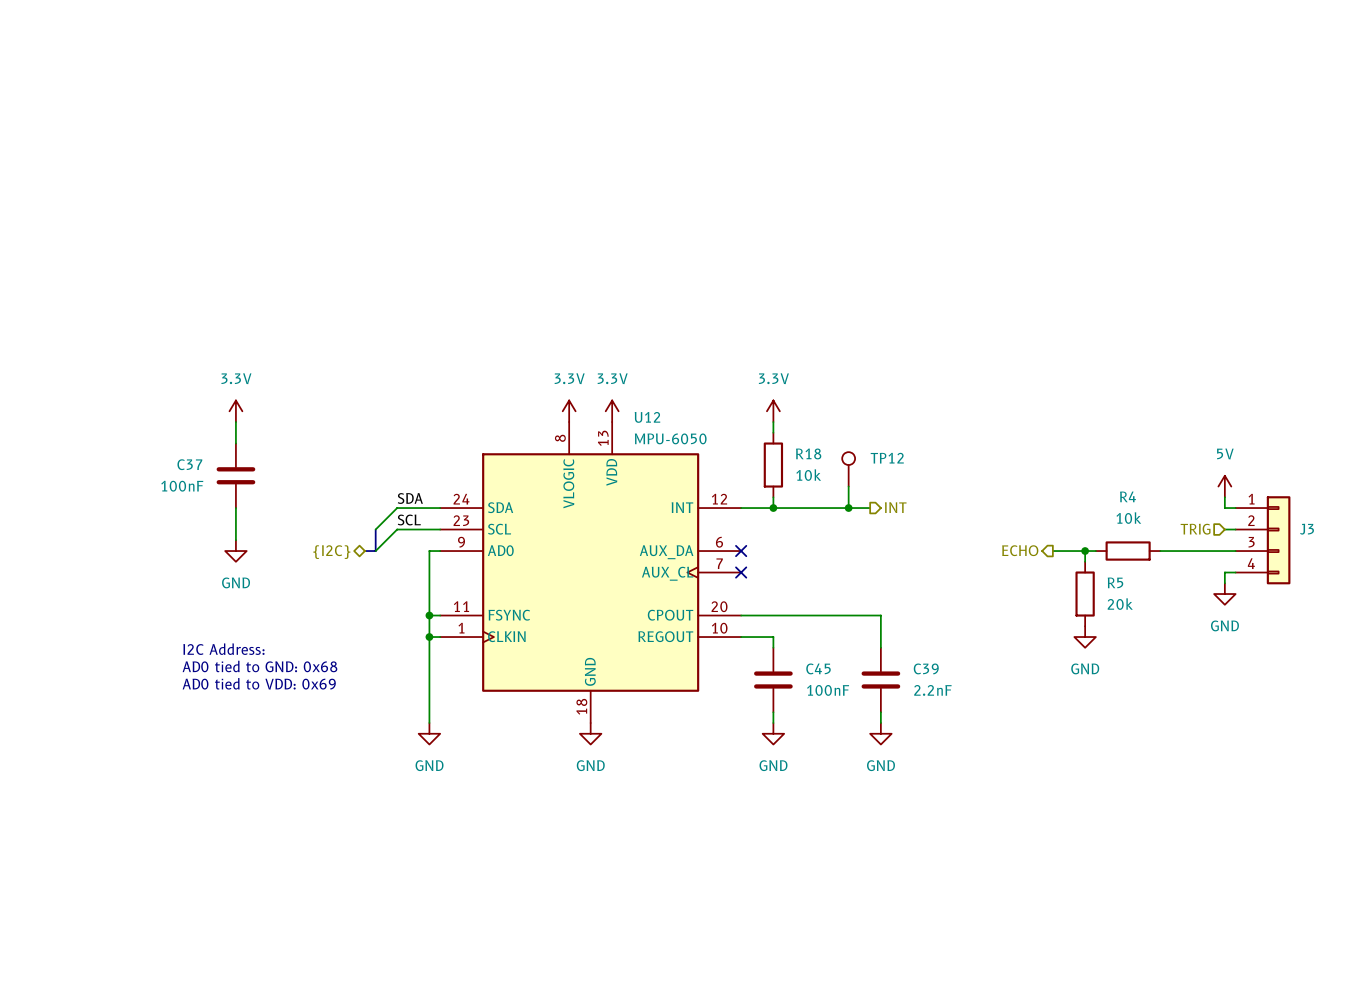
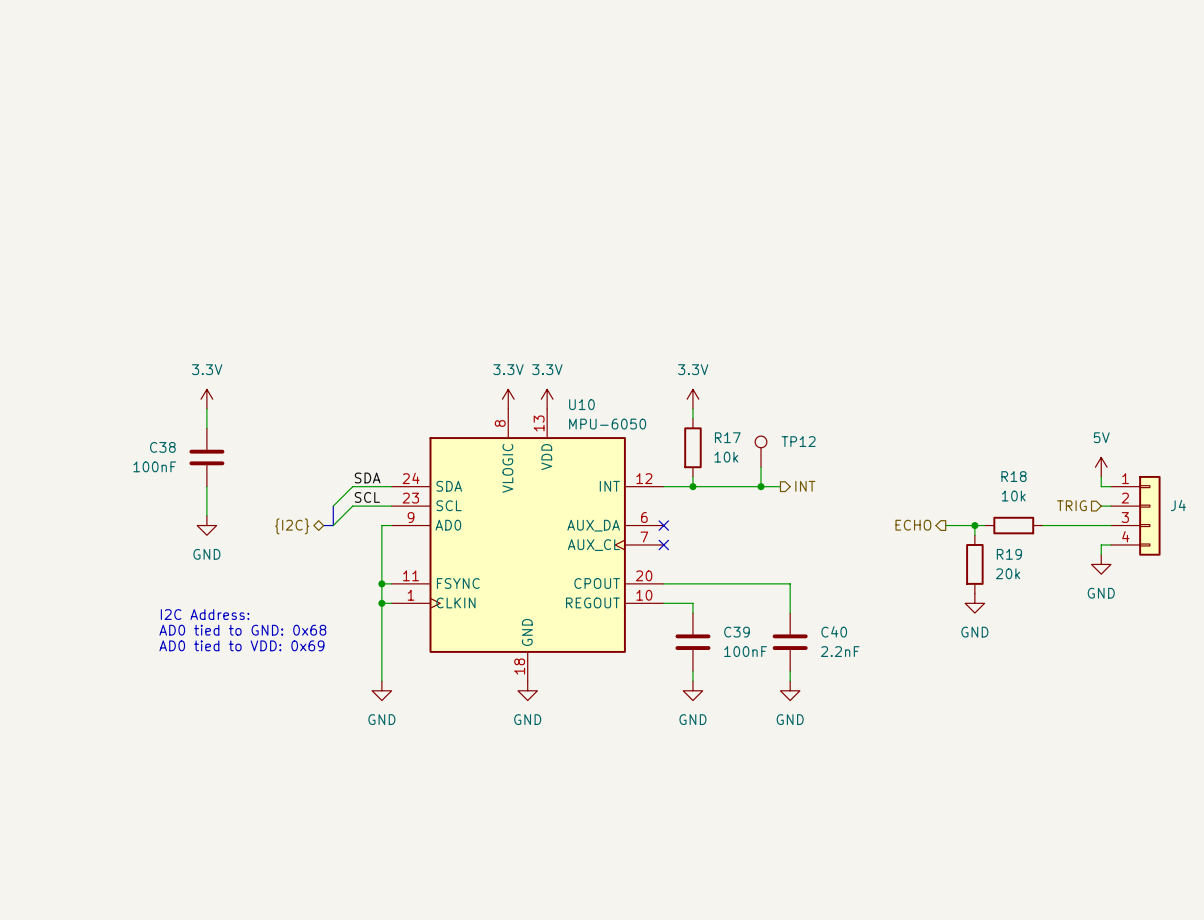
U12 name: U12 (647, 417) -> U10 (581, 404)
R18 name: R18 (808, 453) -> R17 (727, 437)
C37 name: C37 (189, 464) -> C38 (162, 447)
R4 name: R4 (1127, 496) -> R18 (1013, 476)
J3 name: J3 (1307, 529) -> J4 (1178, 505)
R5 name: R5 (1115, 582) -> R19 (1009, 554)
C45 name: C45 (818, 668) -> C39 (737, 632)
C39 name: C39 (926, 668) -> C40 (834, 631)

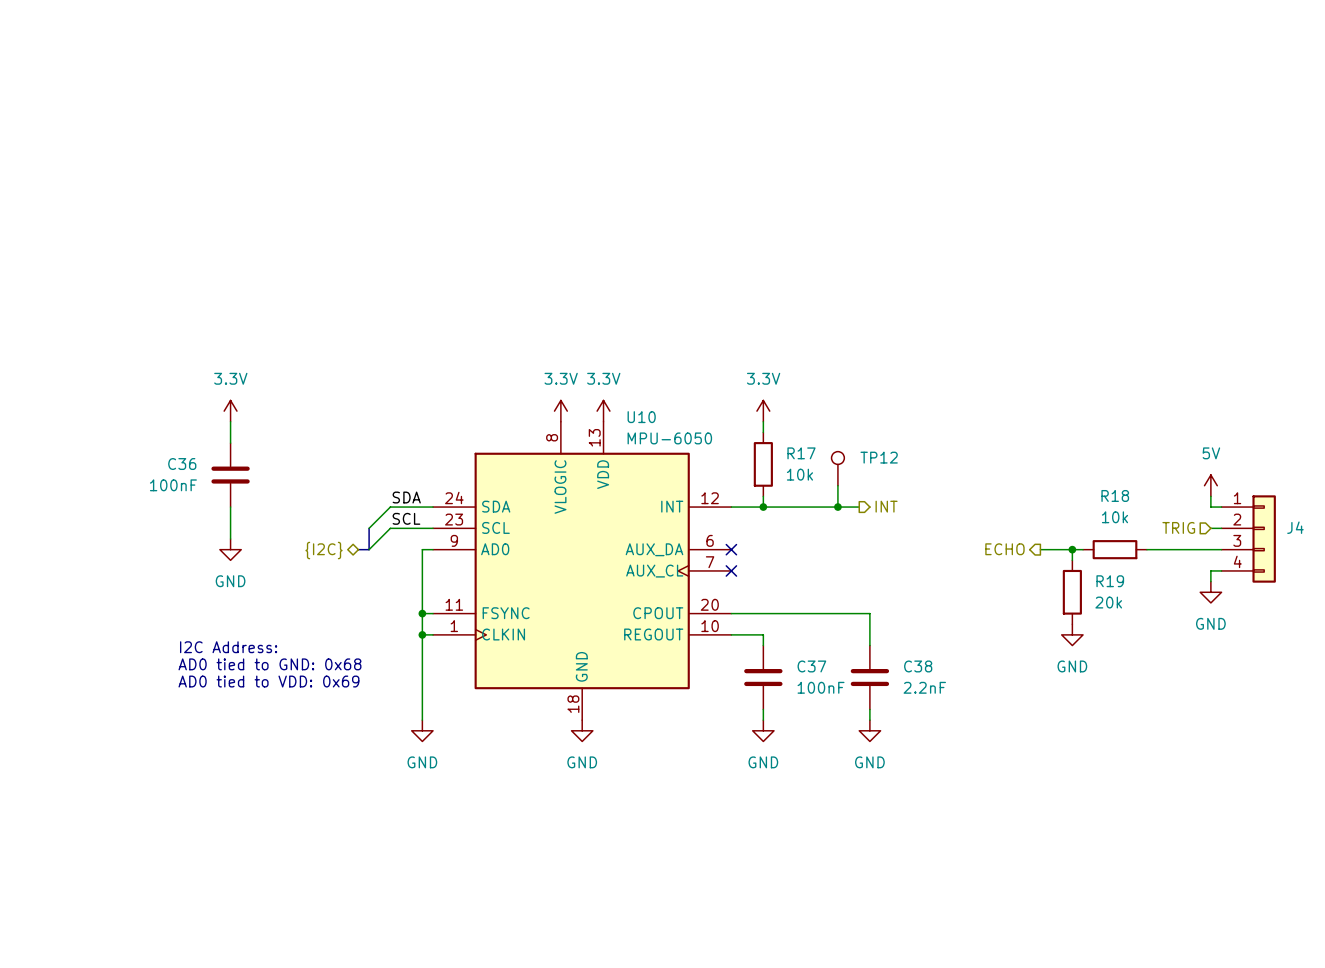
C38 name: C38 (162, 447) -> C36 (182, 464)
C40 name: C40 (834, 631) -> C38 (918, 666)
C39 name: C39 (737, 632) -> C37 (811, 666)

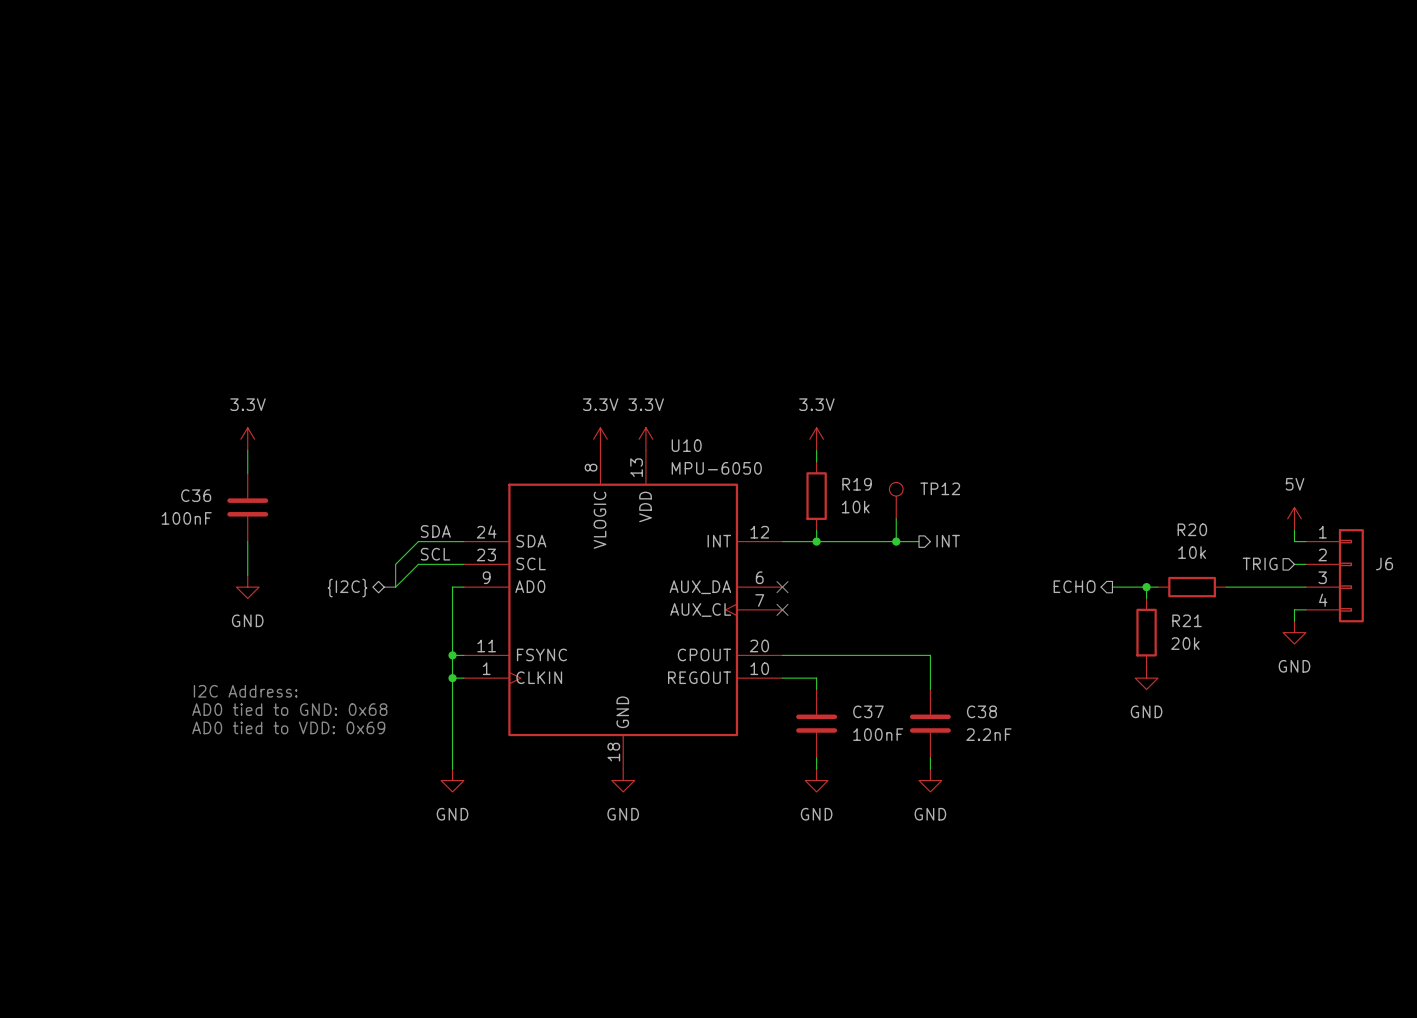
R17 name: R17 (801, 453) -> R19 (857, 484)
R18 name: R18 (1115, 495) -> R20 (1192, 529)
J4 name: J4 (1295, 527) -> J6 (1384, 563)
R19 name: R19 (1110, 581) -> R21 (1187, 620)

